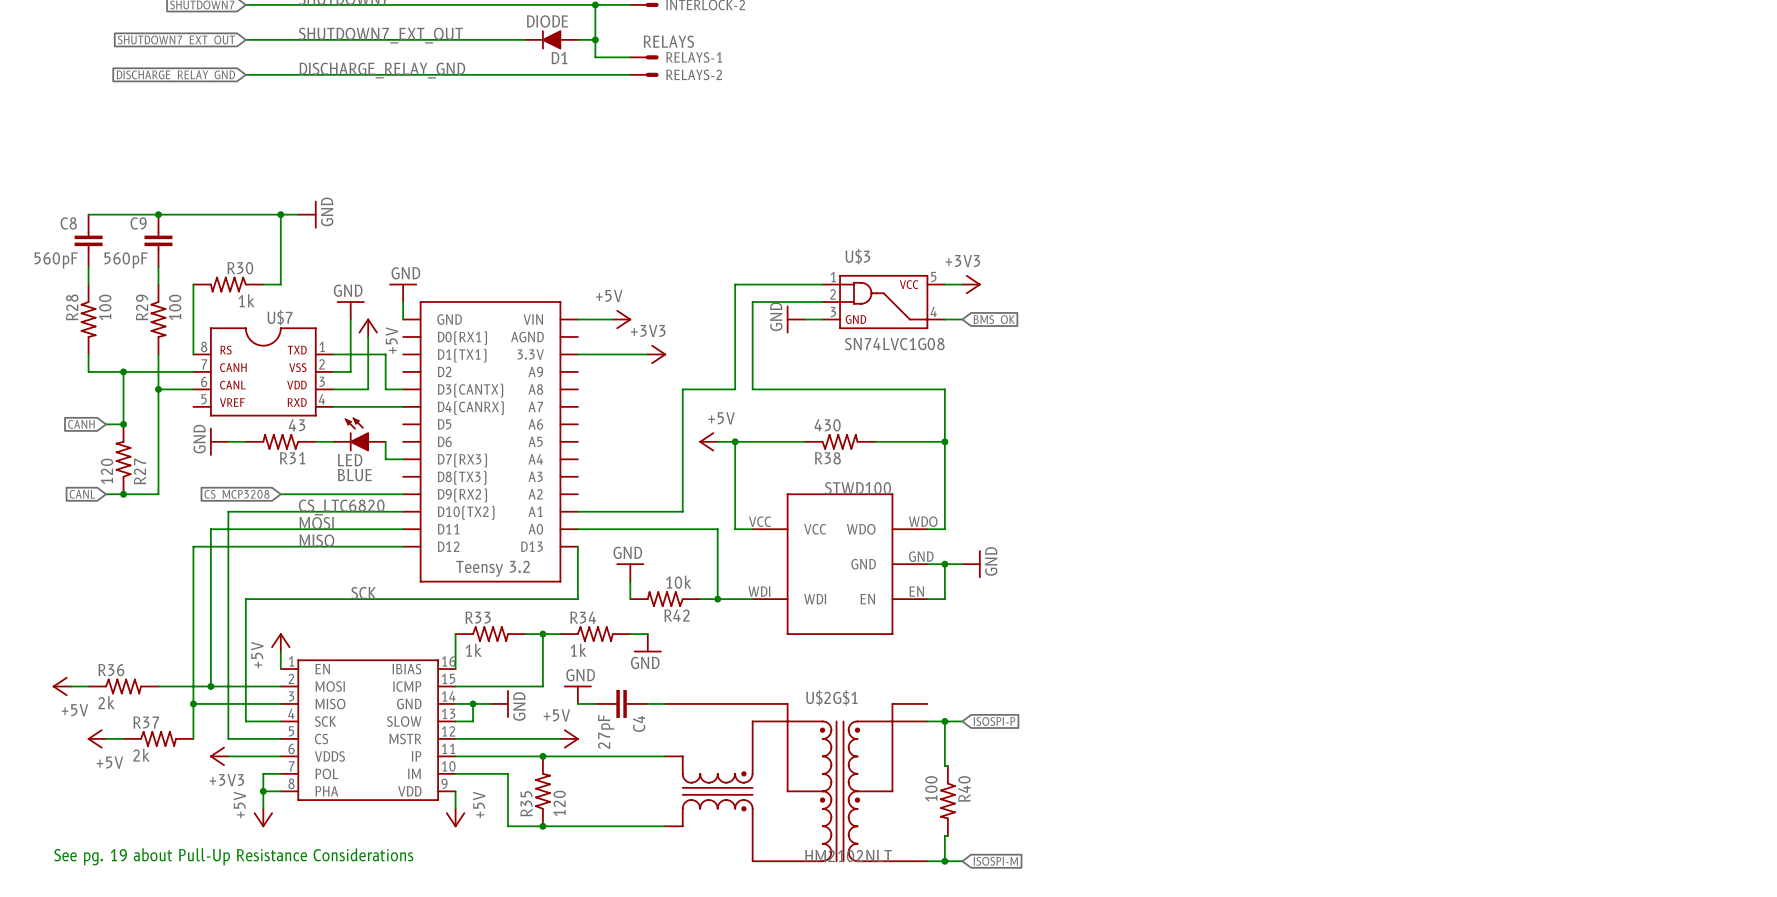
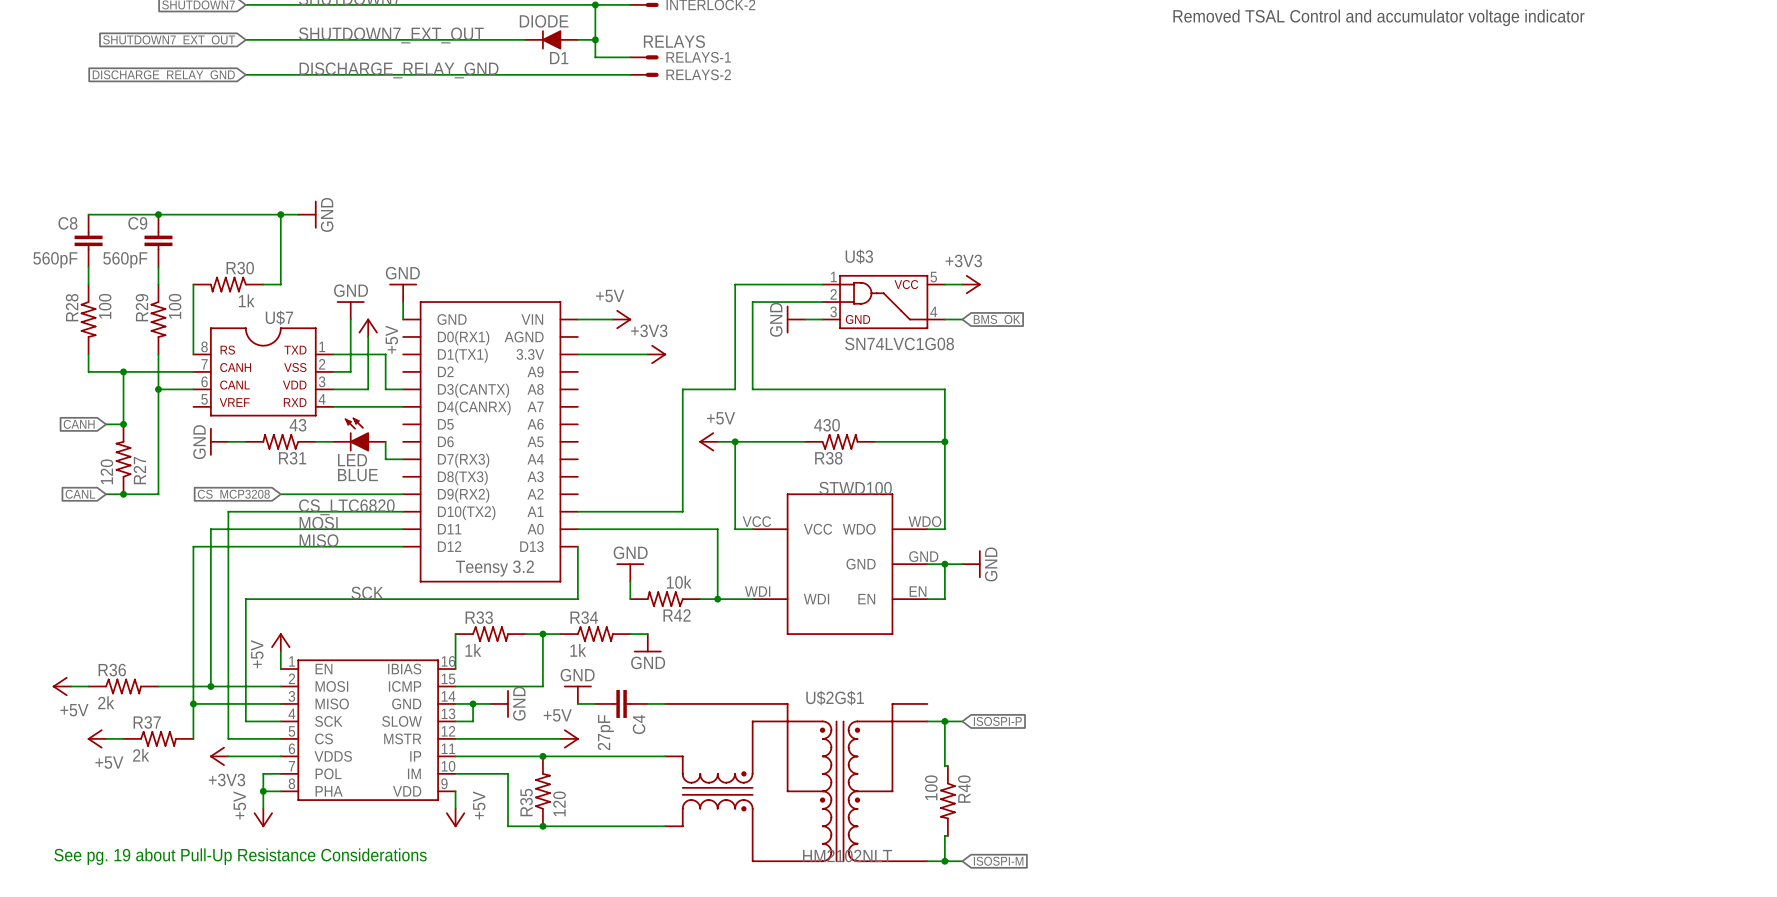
text: none -> Removed TSAL Control and accumulator voltage indicator (1378, 17)

